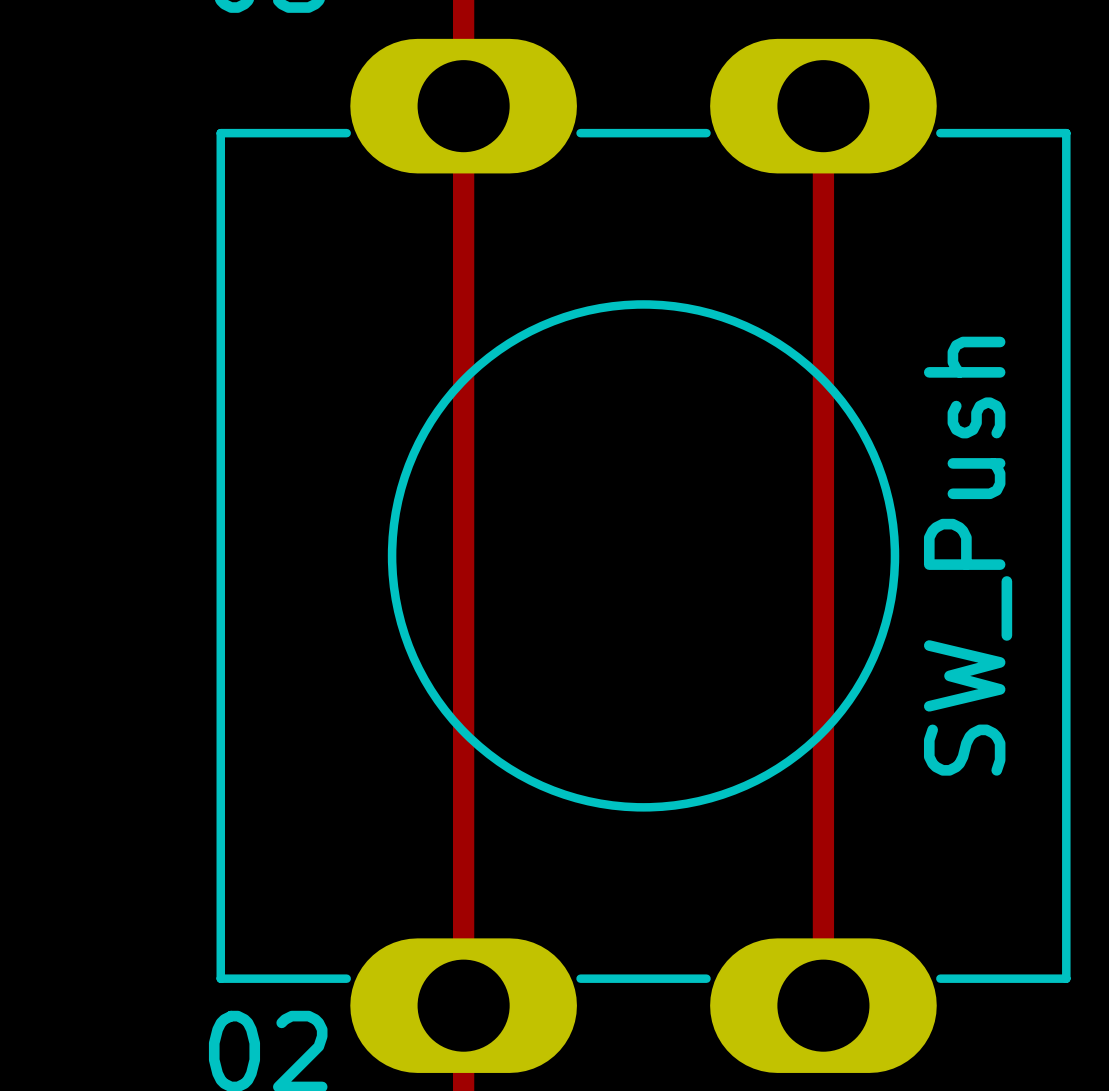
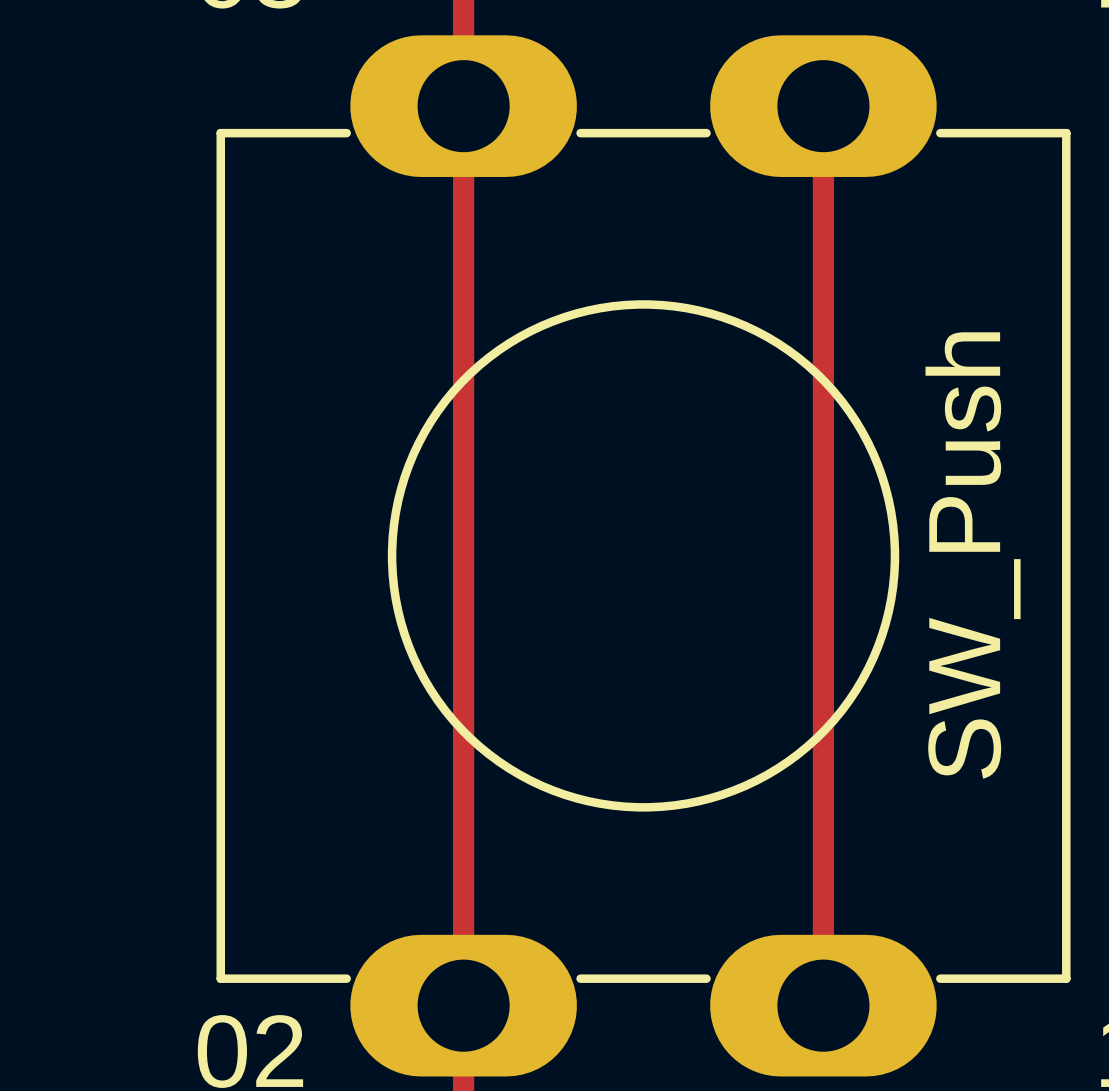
part footprint: [216, 38, 1071, 1073] -> [216, 35, 1071, 1077]

